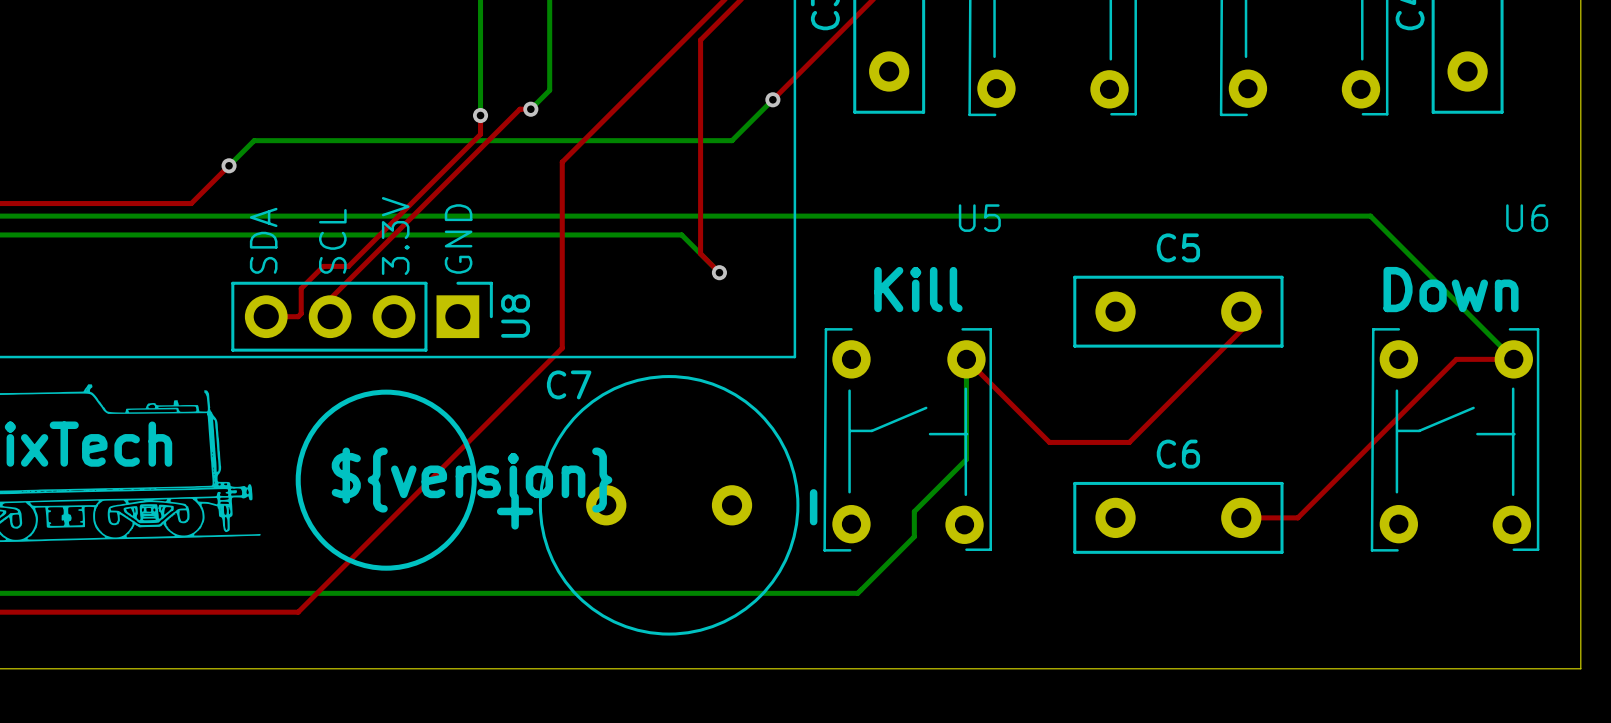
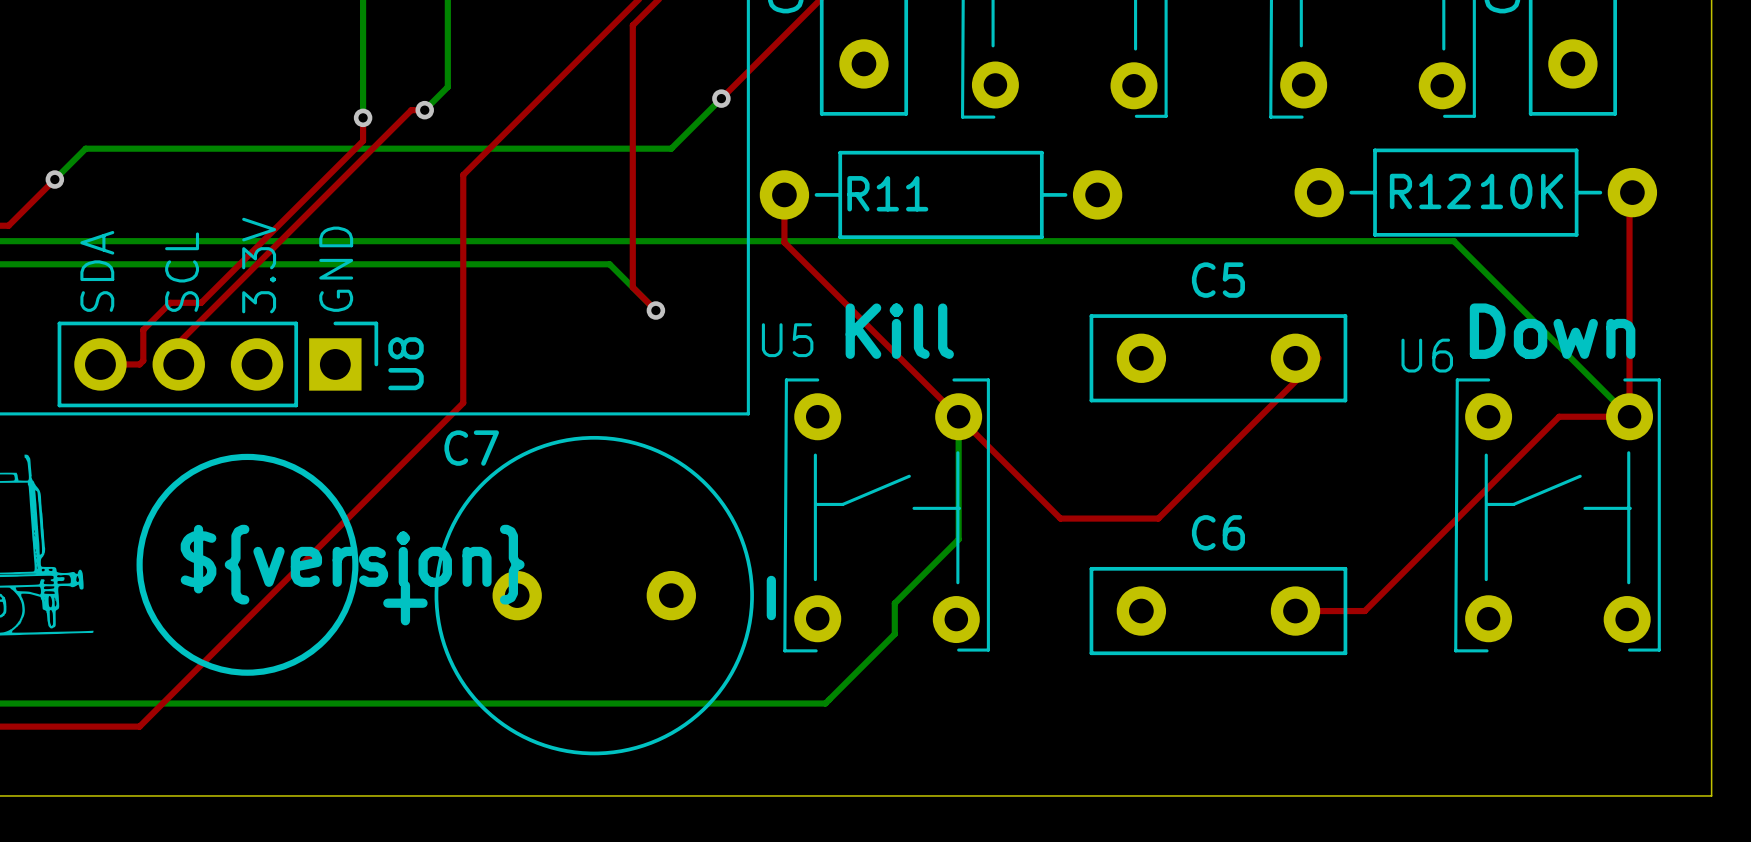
R12: none -> 10K (1475, 192)
top track: none -> (1632, 192) (1629, 195) (1629, 416)
top track: none -> (784, 194) (784, 242) (958, 416)
R11: none -> (941, 194)
U5 name position: U5 (979, 218) -> U5 (787, 340)
U6 name position: U6 (1527, 218) -> U6 (1427, 355)

